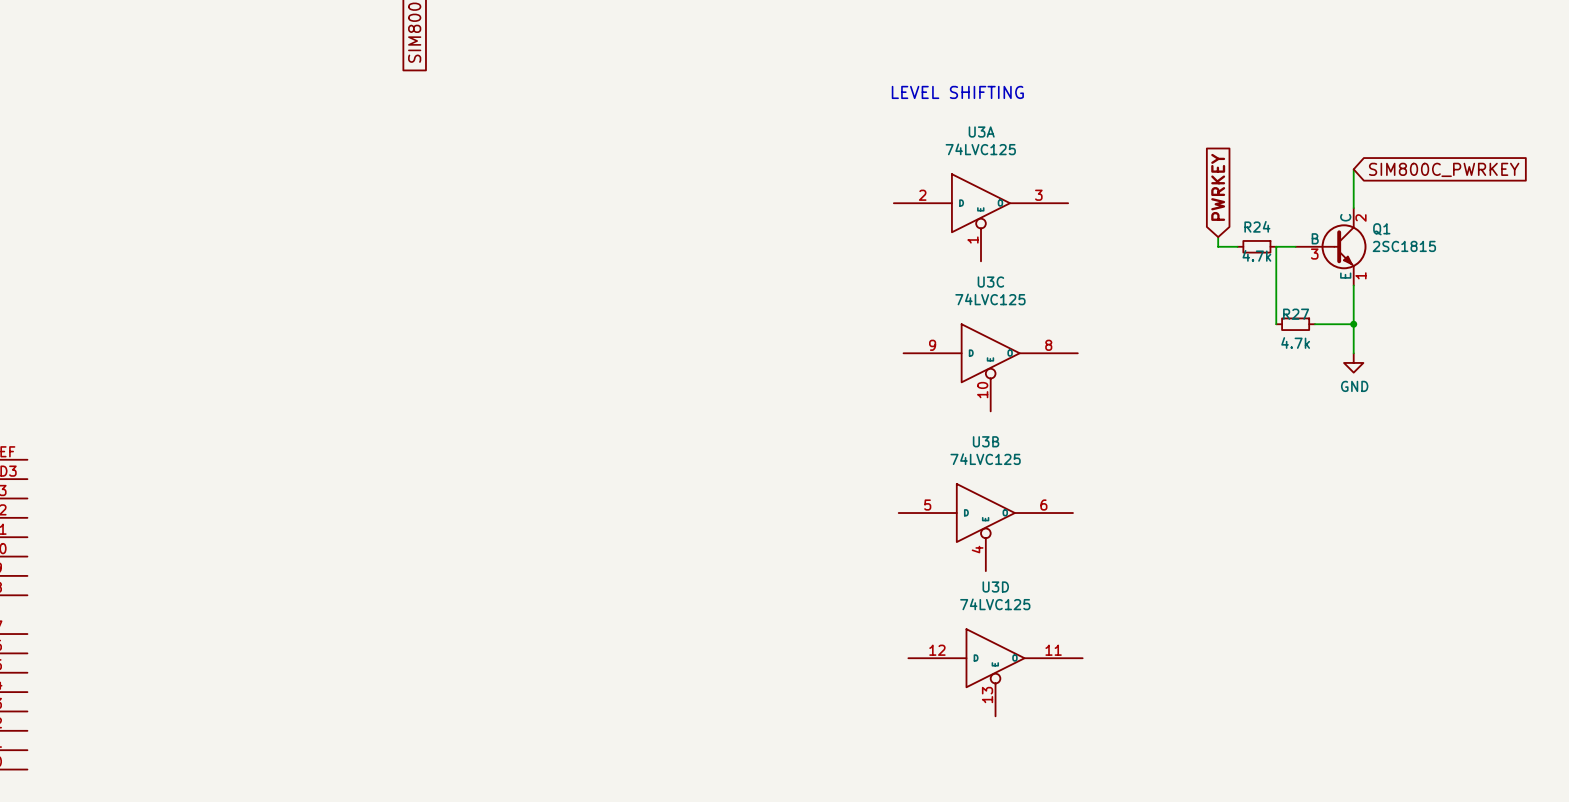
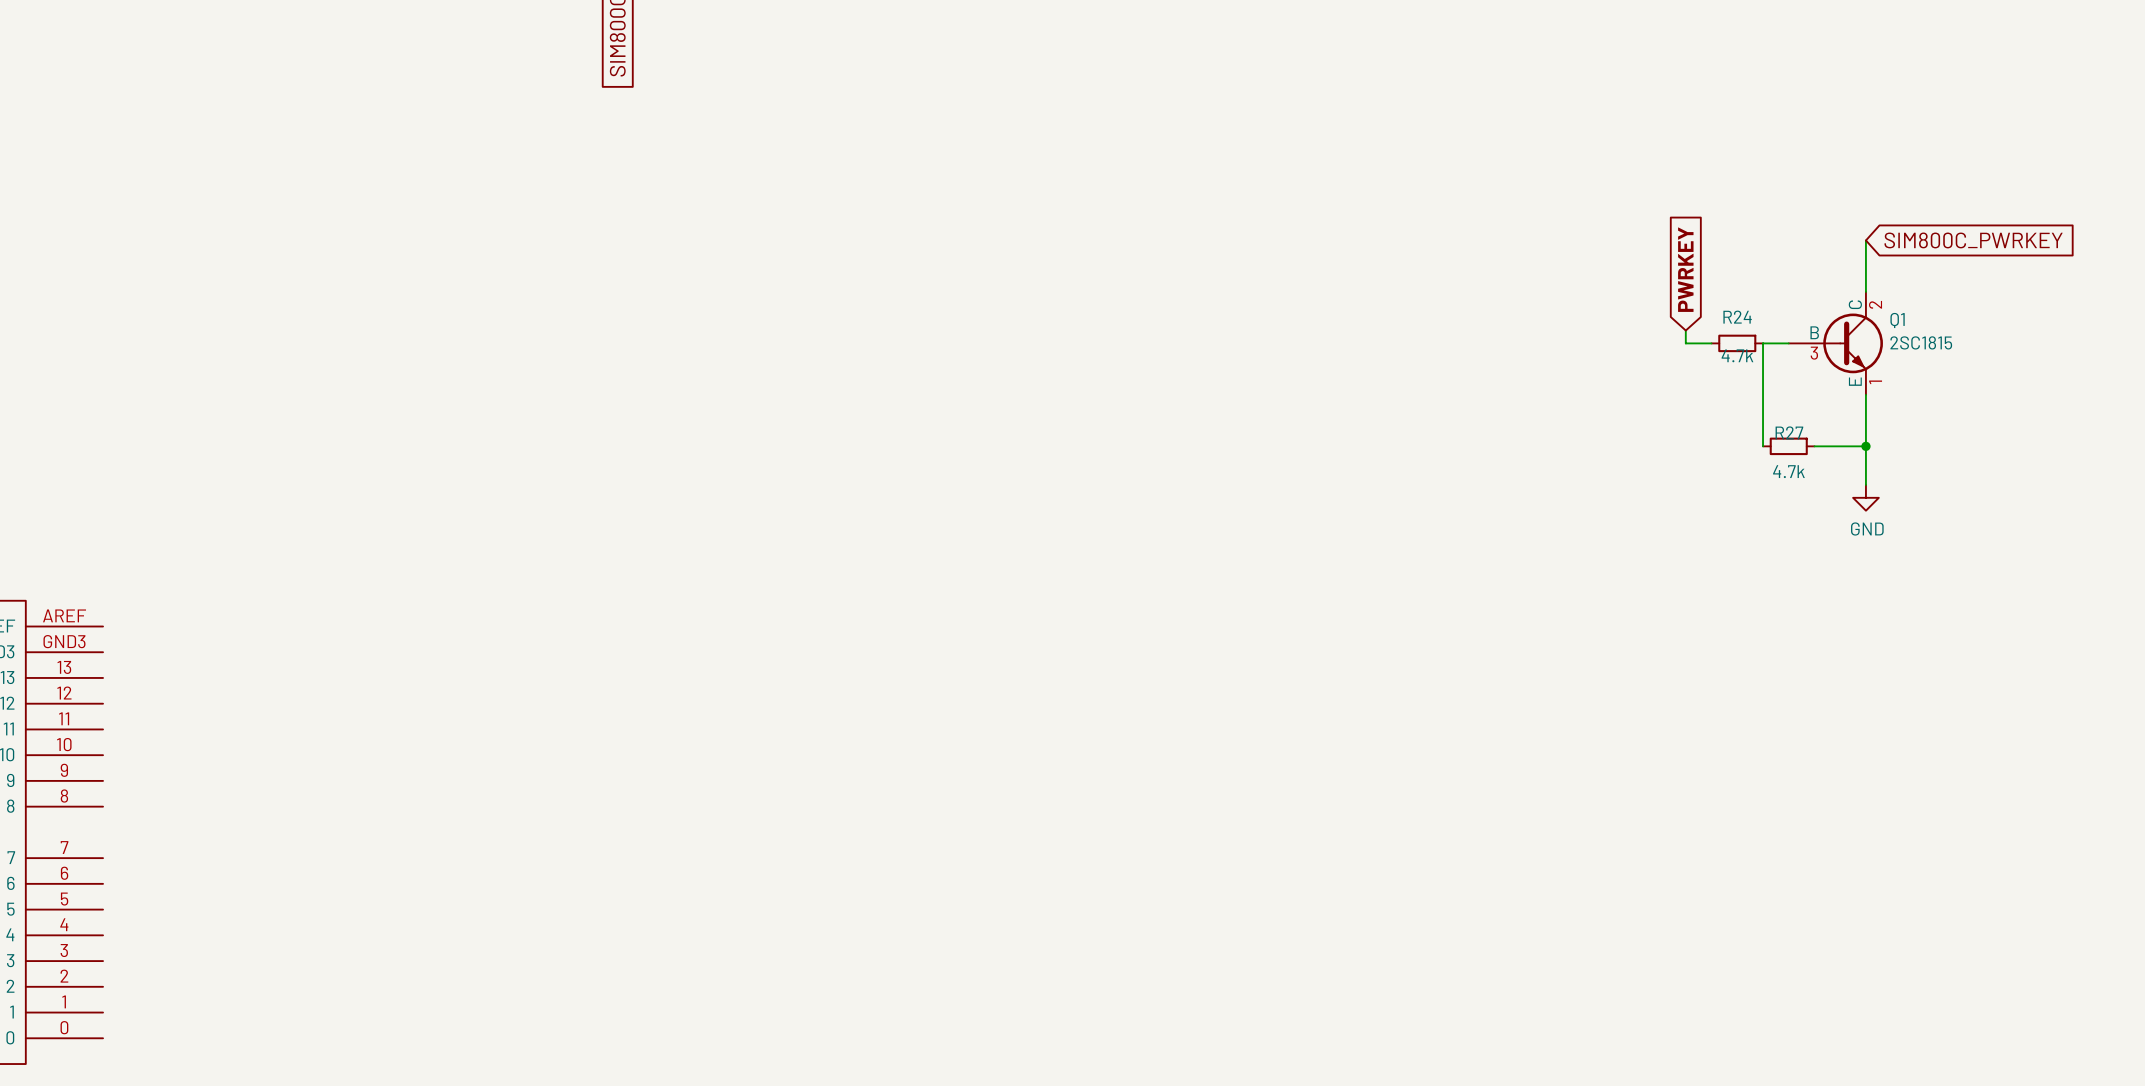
text: LEVEL SHIFTING (957, 92) -> none
U3A: 74LVC125 (981, 217) -> none
U3C: 74LVC125 (990, 367) -> none
U3B: 74LVC125 (985, 527) -> none
U3D: 74LVC125 (995, 672) -> none

